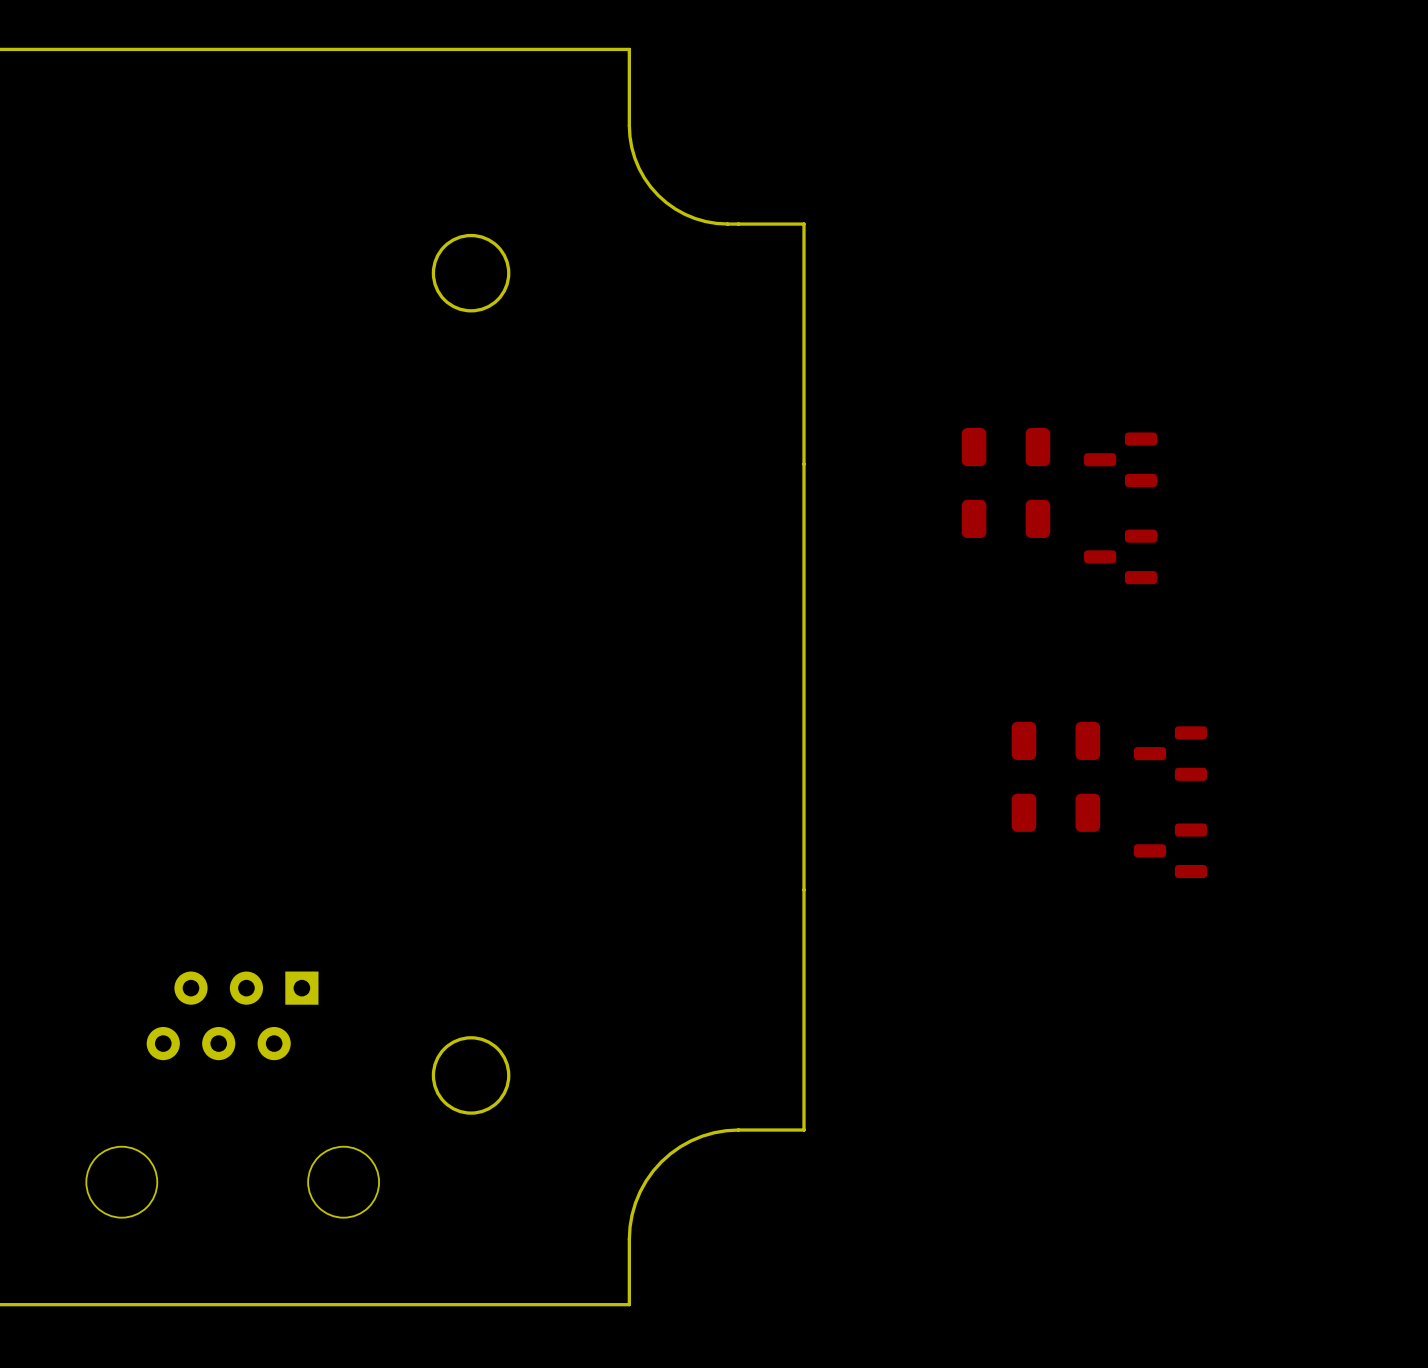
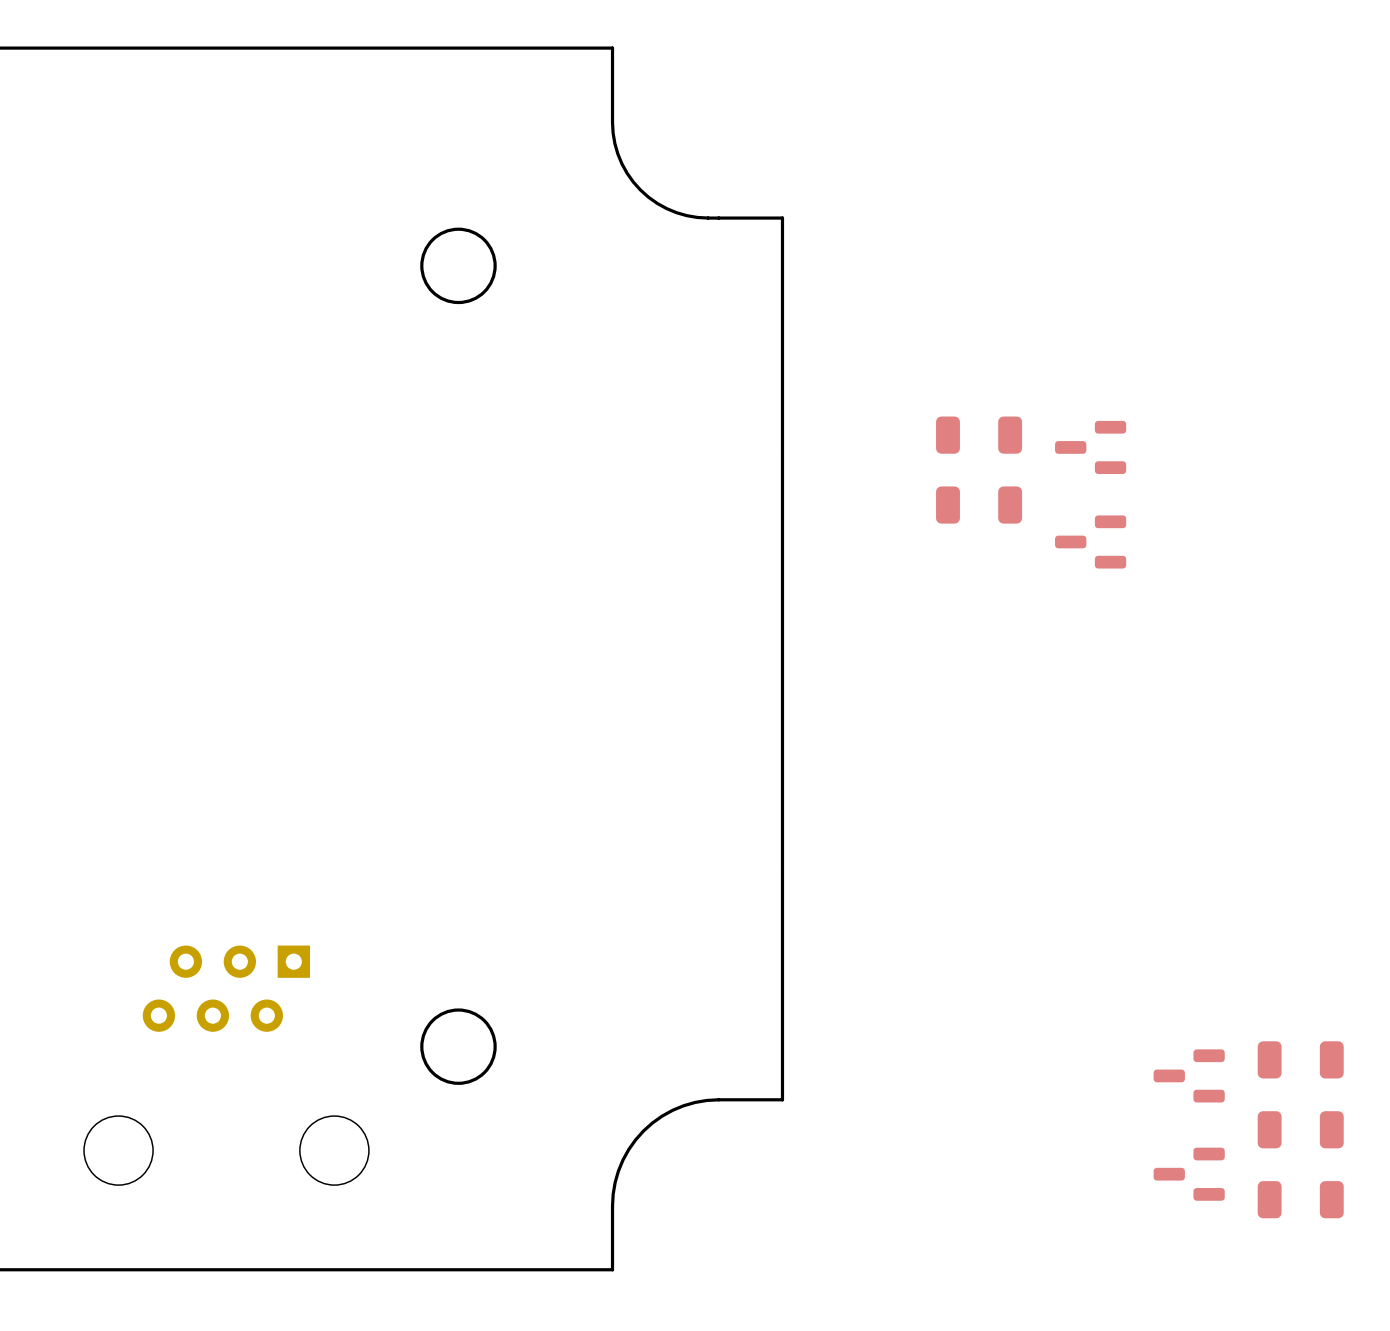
part: (1055, 740) -> none
part: (1170, 753) -> none
part: (1055, 812) -> none
part: (1170, 850) -> none
part: none -> (1300, 1059)
part: none -> (1189, 1075)
part: none -> (1300, 1129)
part: none -> (1189, 1174)
part: none -> (1300, 1199)

